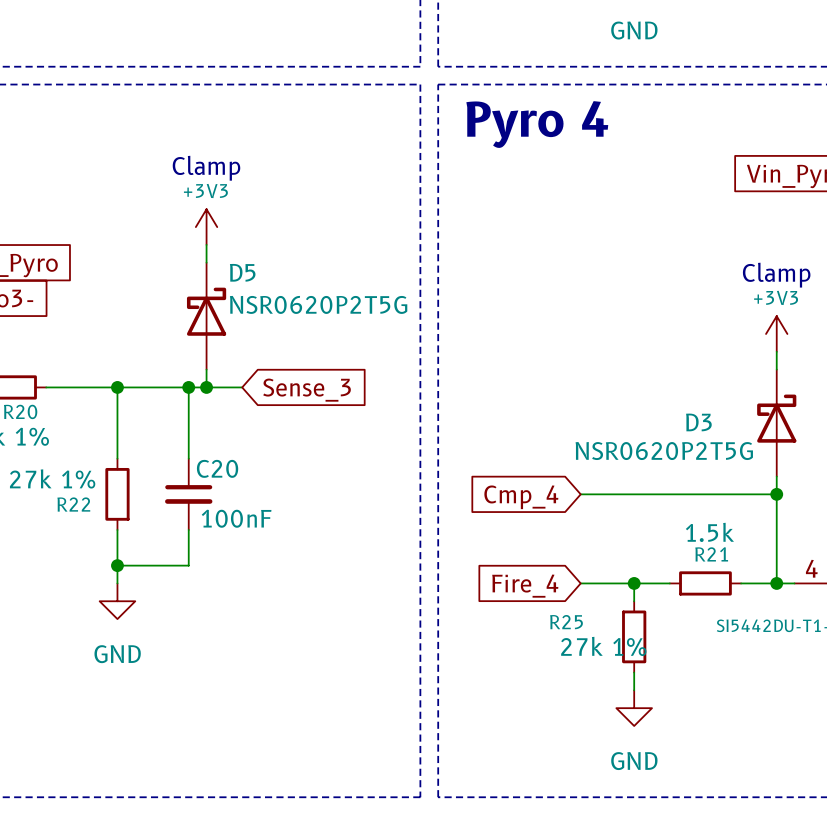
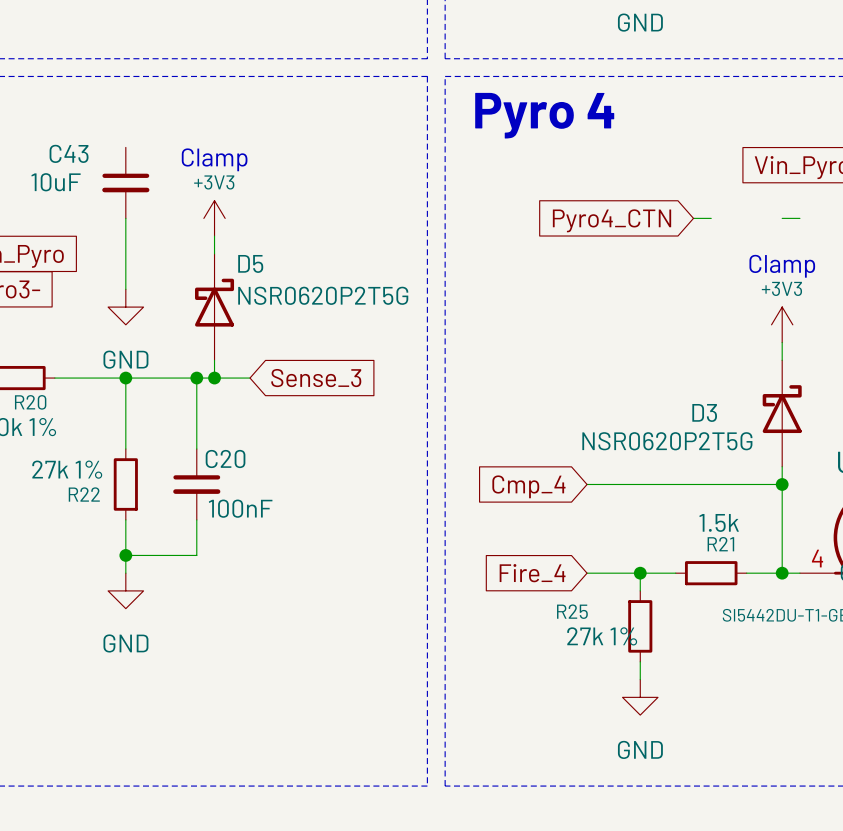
C43: none -> 10uF (125, 182)
wire: none -> (125, 218) (125, 289)
wire: none -> (693, 218) (711, 218)
wire: none -> (782, 218) (799, 218)
global label: none -> Pyro4_CTN (612, 220)
power symbol: none -> GND (125, 307)

